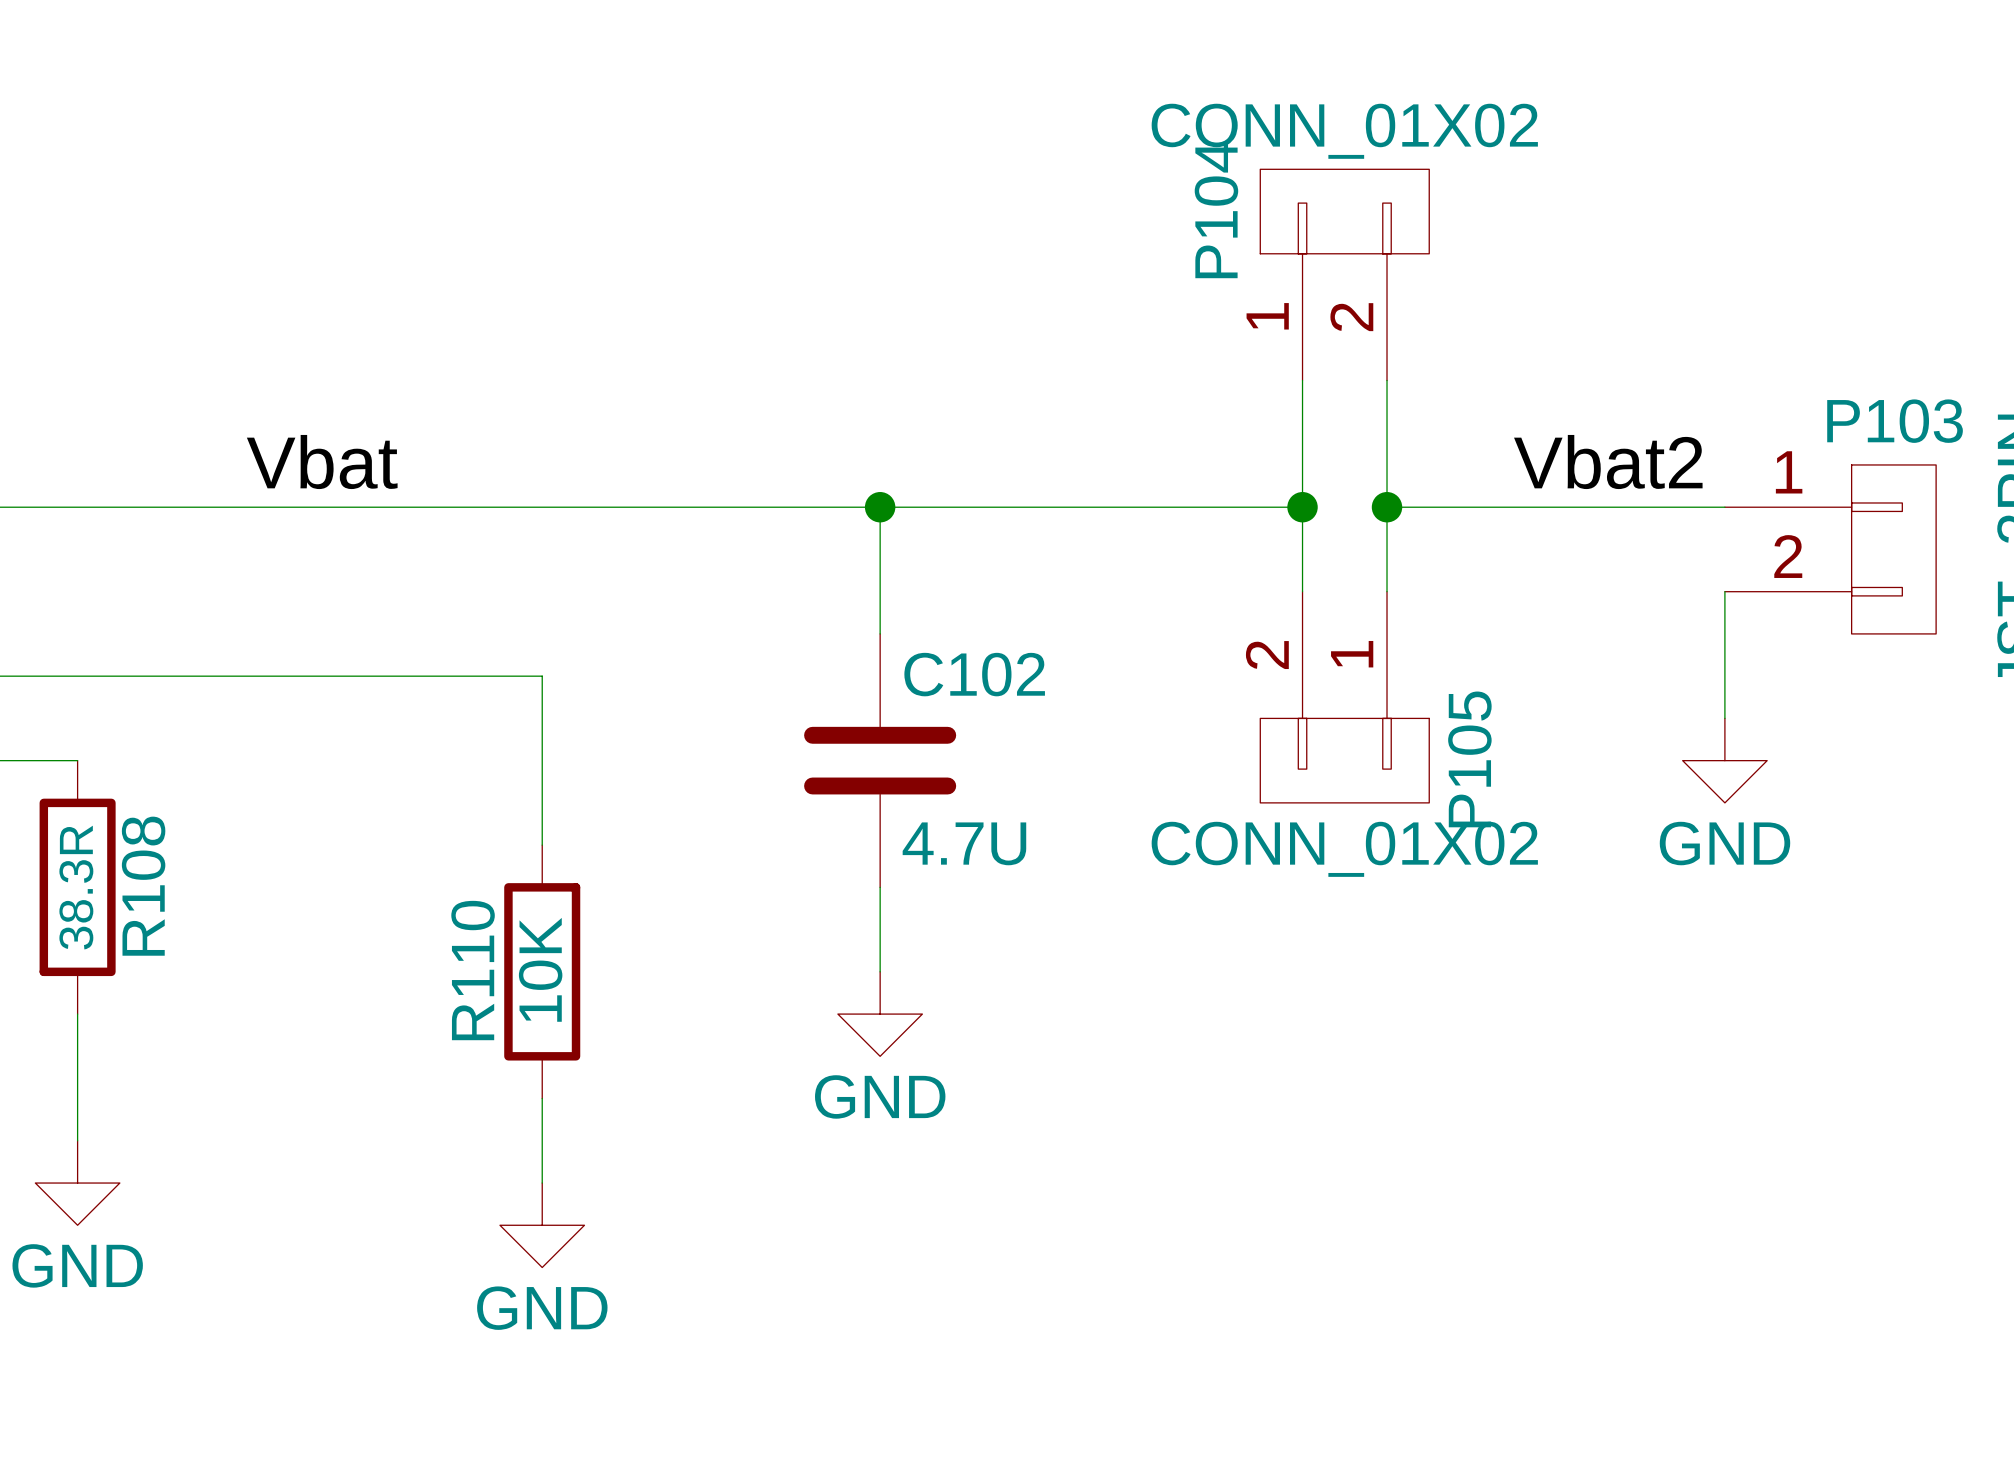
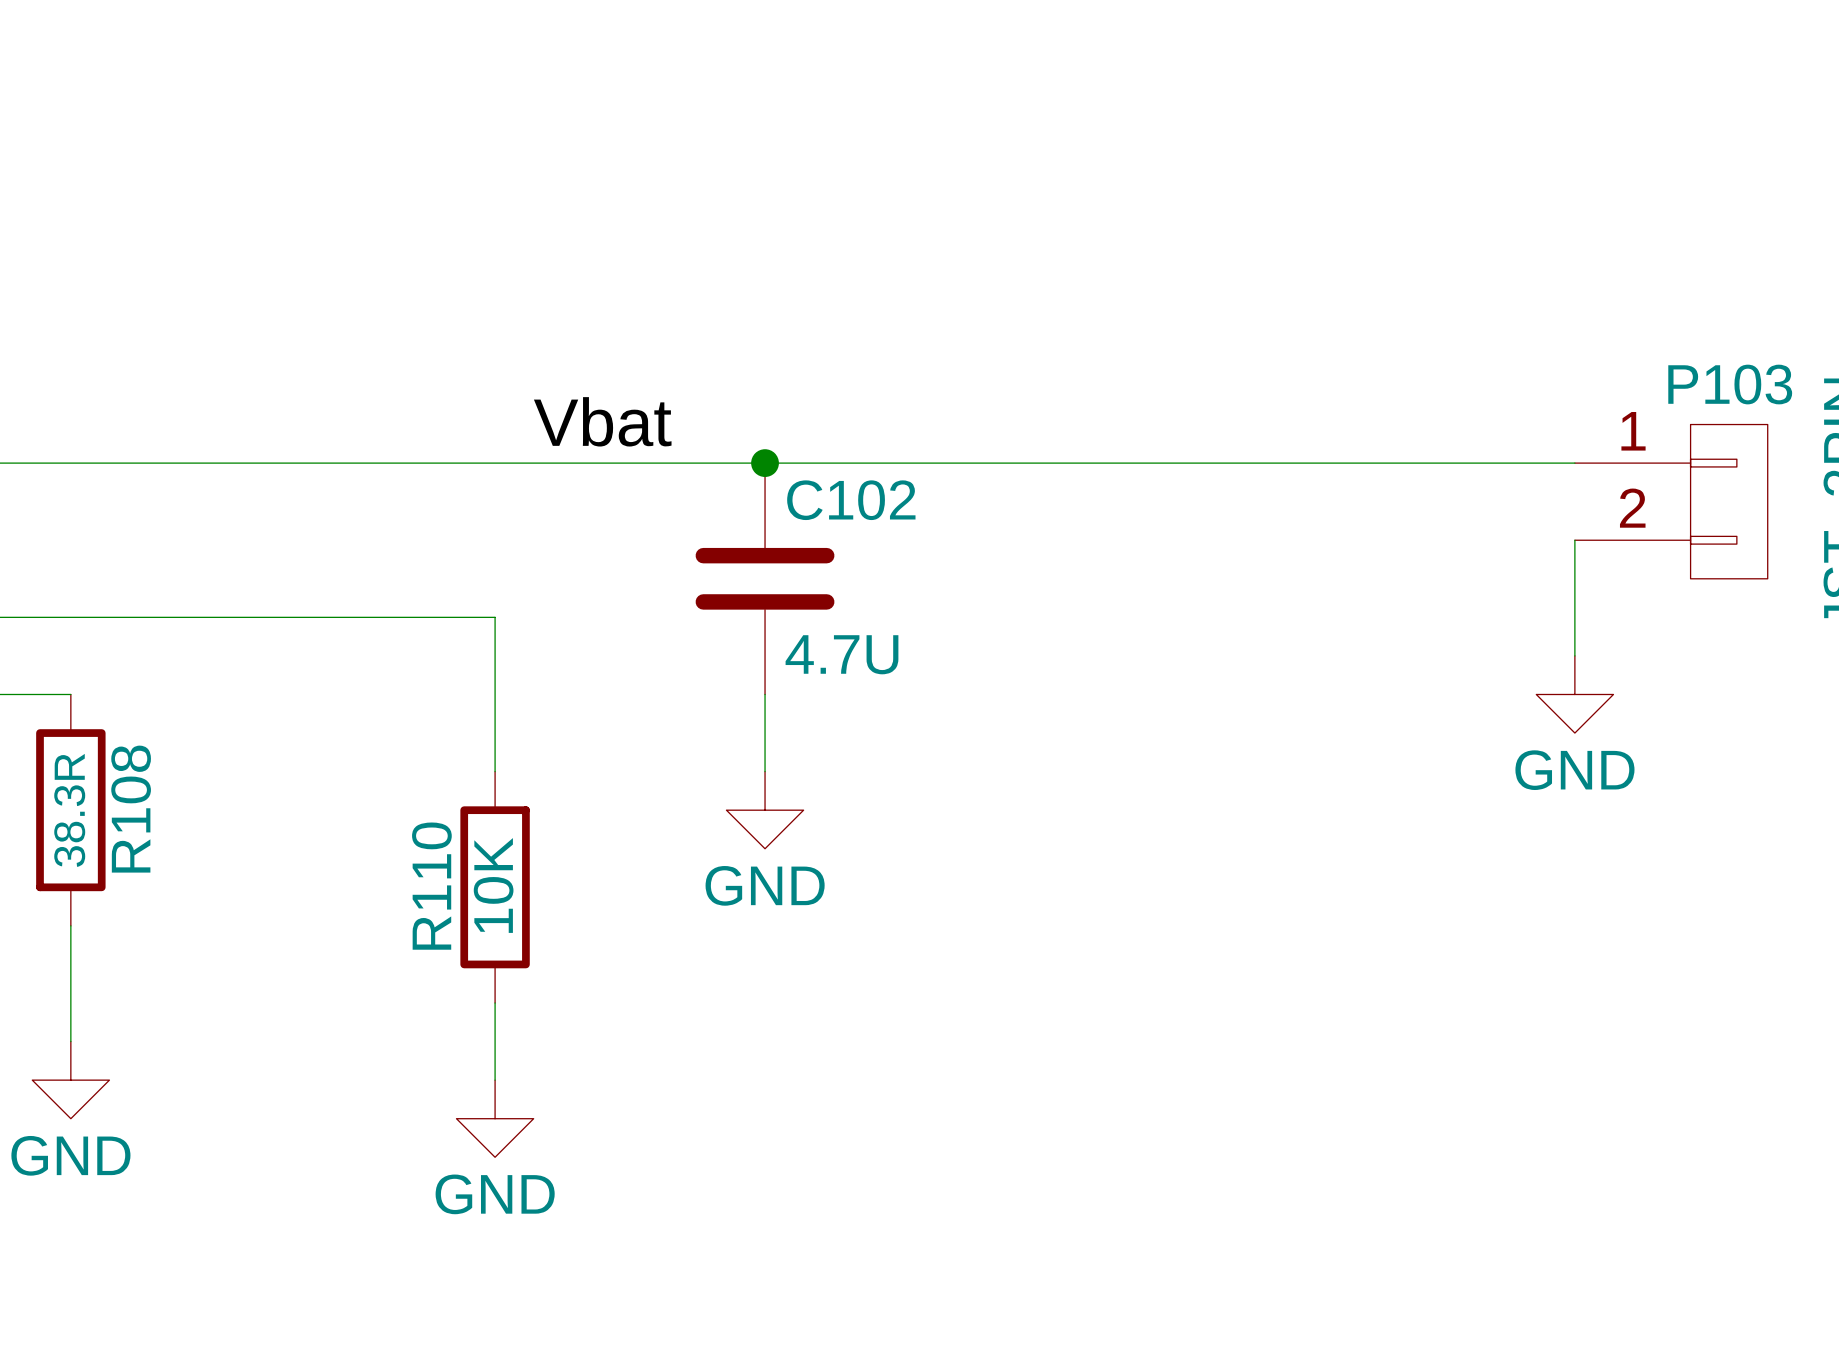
P104: CONN_01X02 (1344, 274) -> none
wire: (1302, 380) (1302, 591) -> none
wire: (1387, 380) (1387, 591) -> none
label position: Vbat (322, 462) -> Vbat (602, 421)
label: Vbat2 (1608, 462) -> none
wire: (880, 507) (880, 633) -> none
junction position: (880, 507) -> (765, 463)
wire: none -> (1189, 463) (1266, 463)
junction: (1302, 507) -> none
junction: (1387, 507) -> none
P105: CONN_01X02 (1344, 697) -> none
C102 position: (880, 760) -> (765, 578)
wire: (880, 887) (880, 971) -> (765, 694) (765, 771)
power symbol position: GND (880, 1014) -> GND (765, 810)

